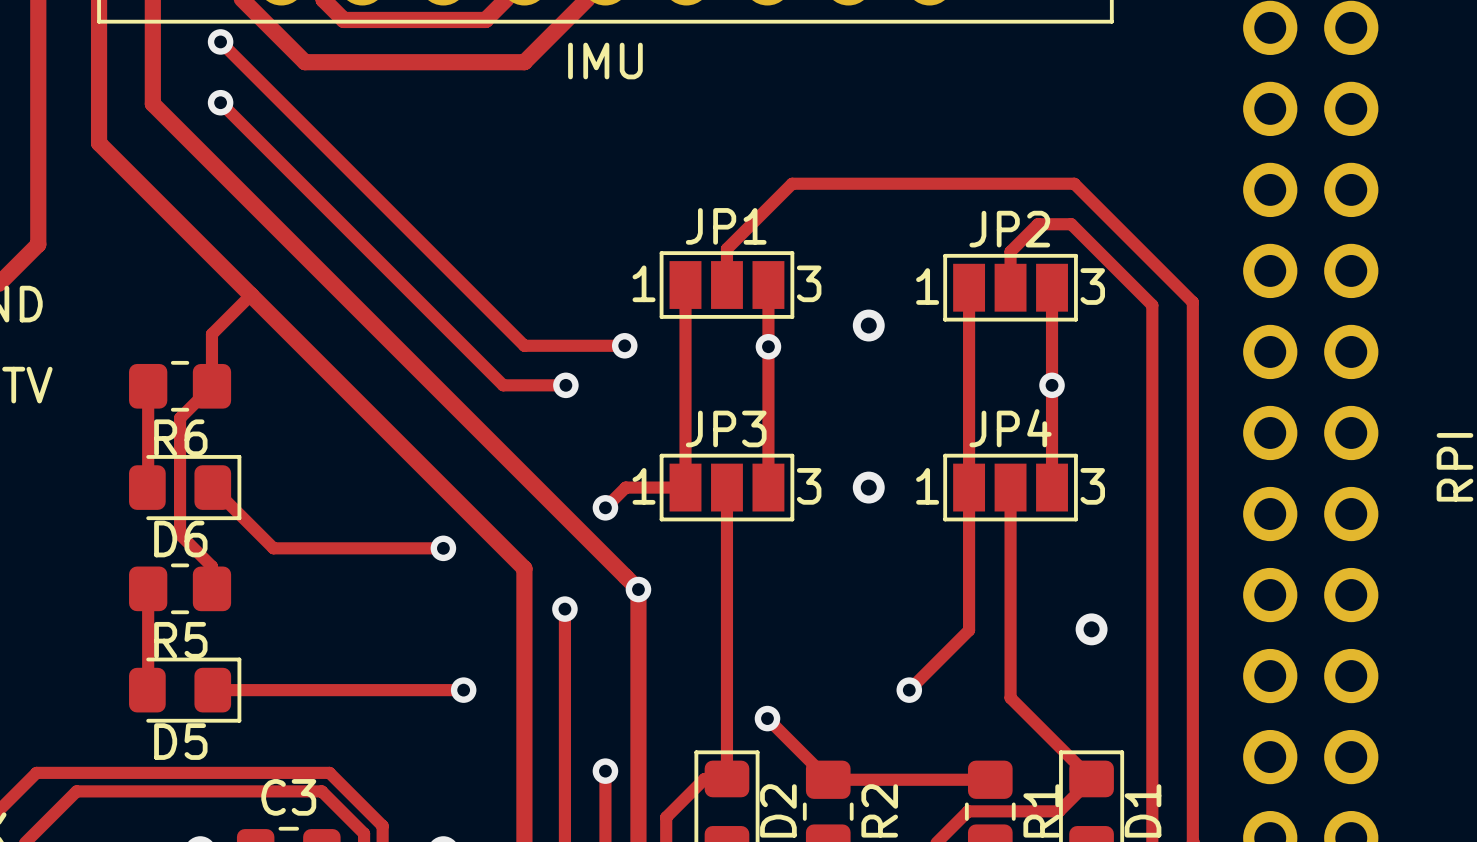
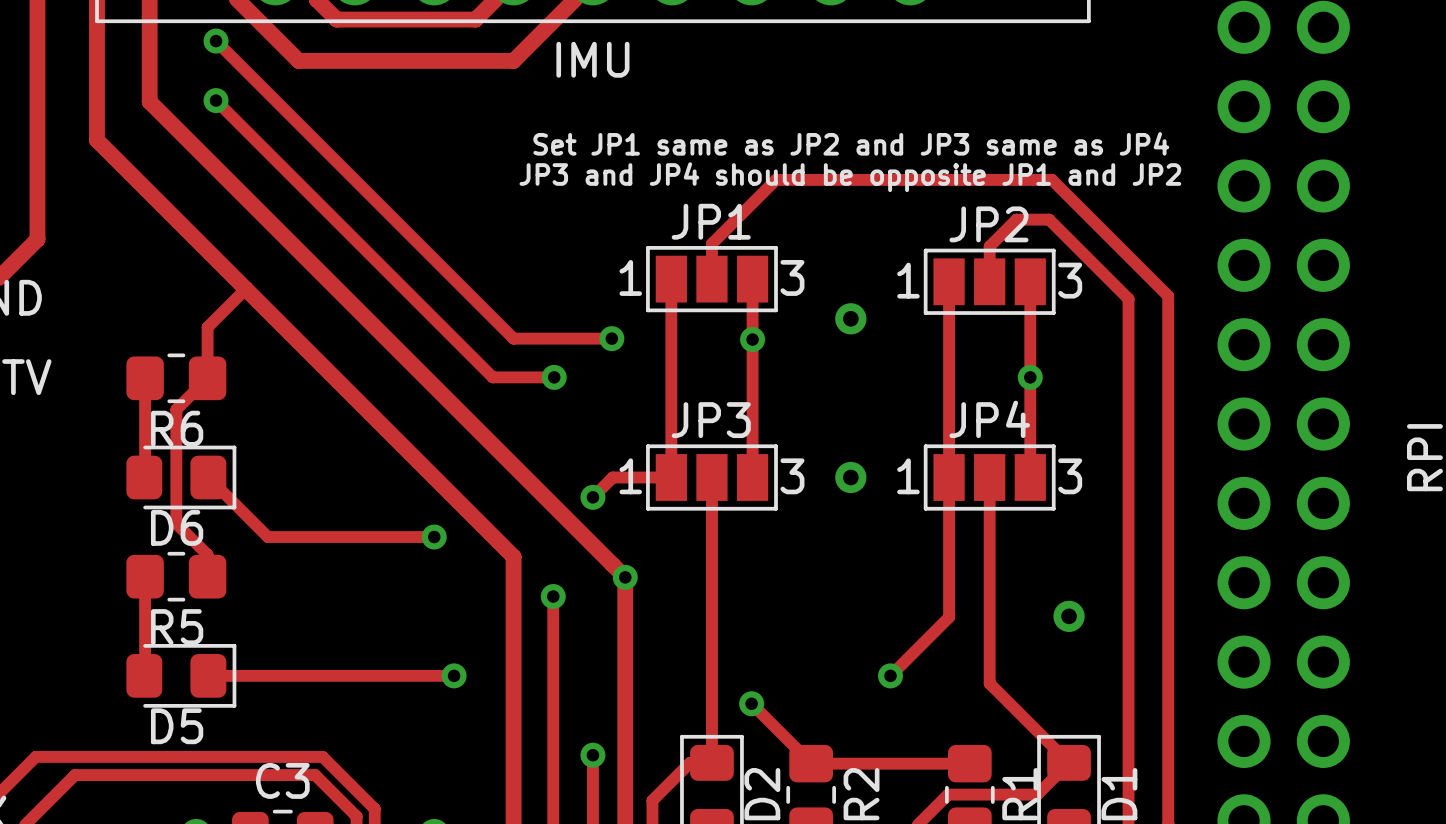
text: none -> Set JP1 same as JP2 and JP3 same as JP4 (851, 143)
text: none -> JP3 and JP4 should be opposite JP1 and JP2 (850, 177)

